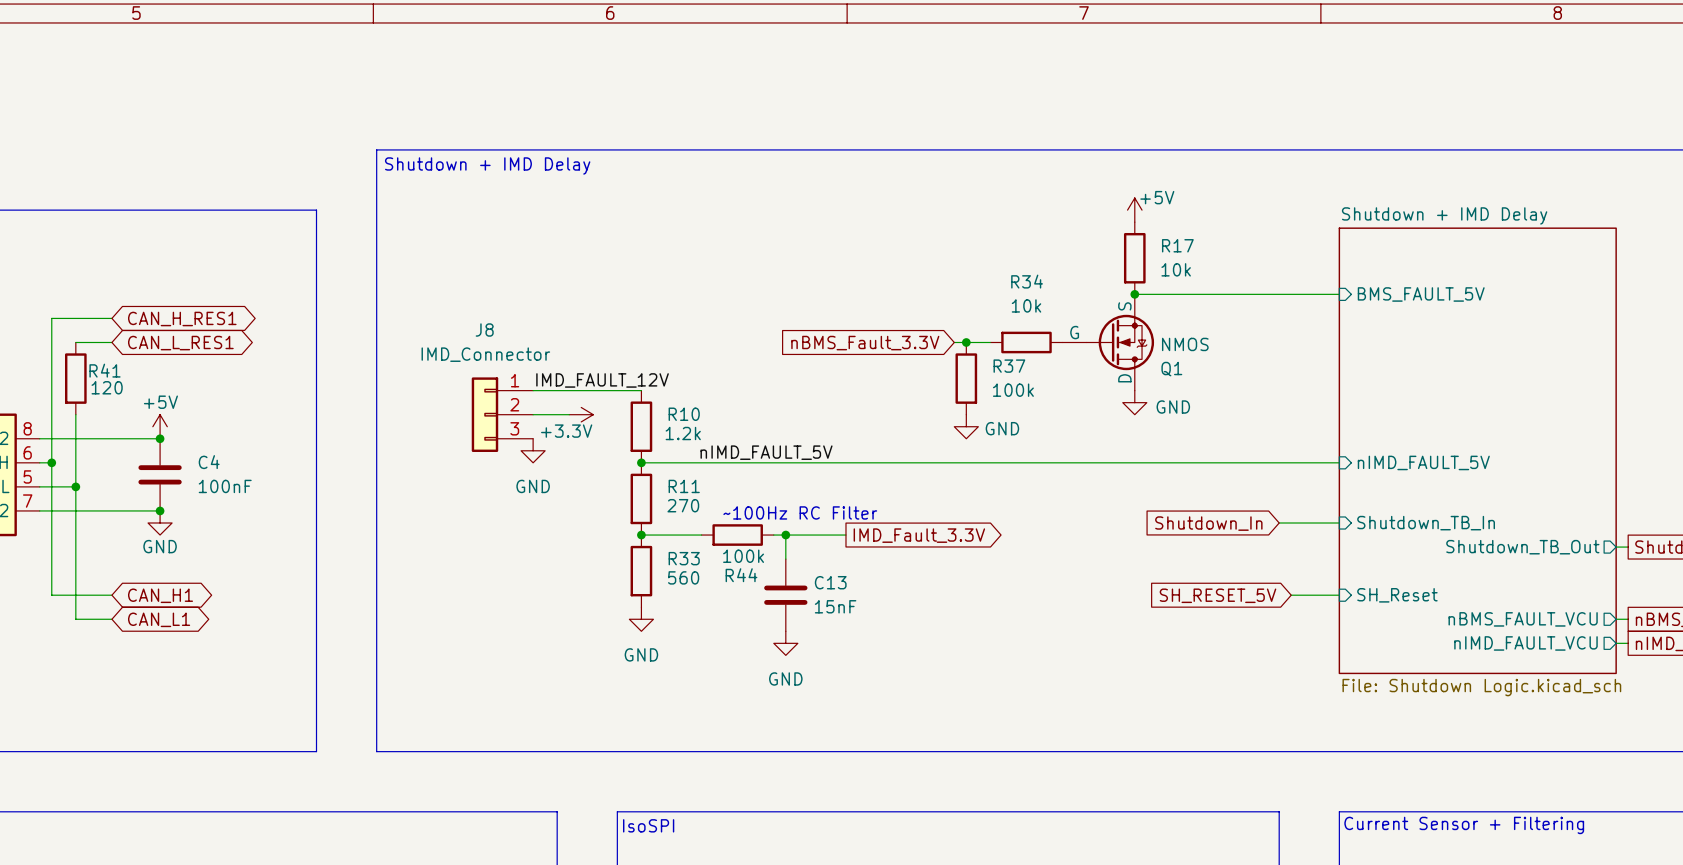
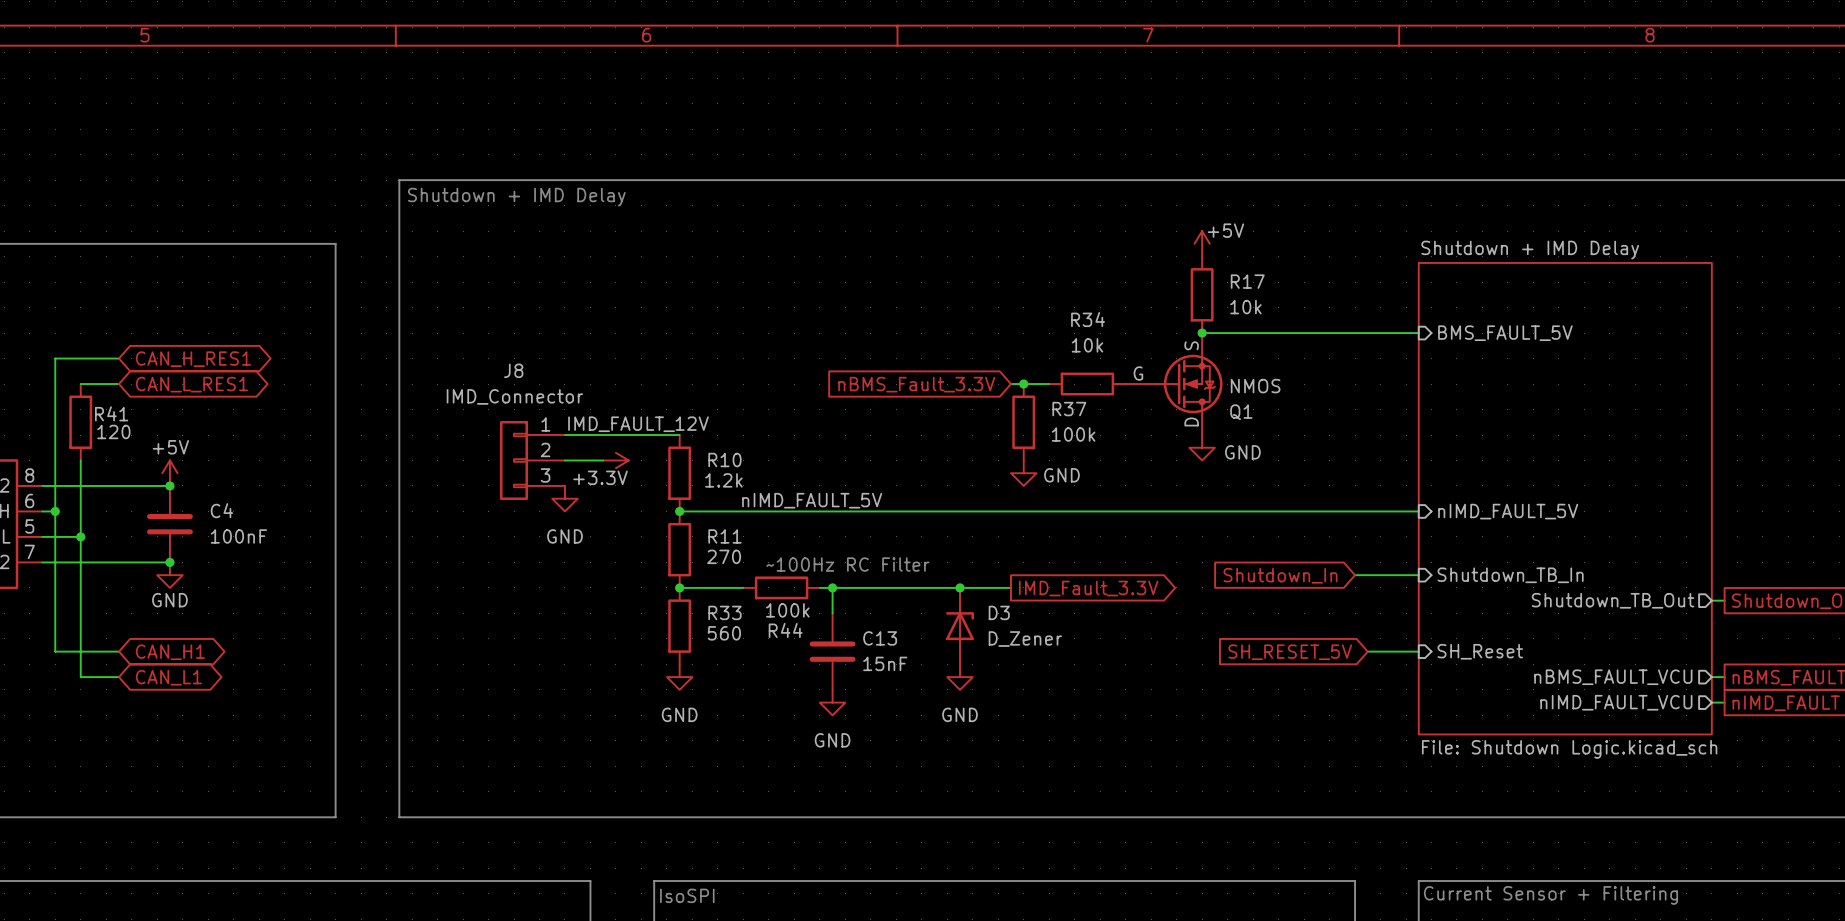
wire: none -> (896, 587) (1010, 587)
junction: none -> (960, 587)
global label position: IMD_Fault_3.3V (919, 535) -> IMD_Fault_3.3V (1088, 588)
D3: none -> D_Zener (960, 626)
power symbol: none -> GND (960, 677)

